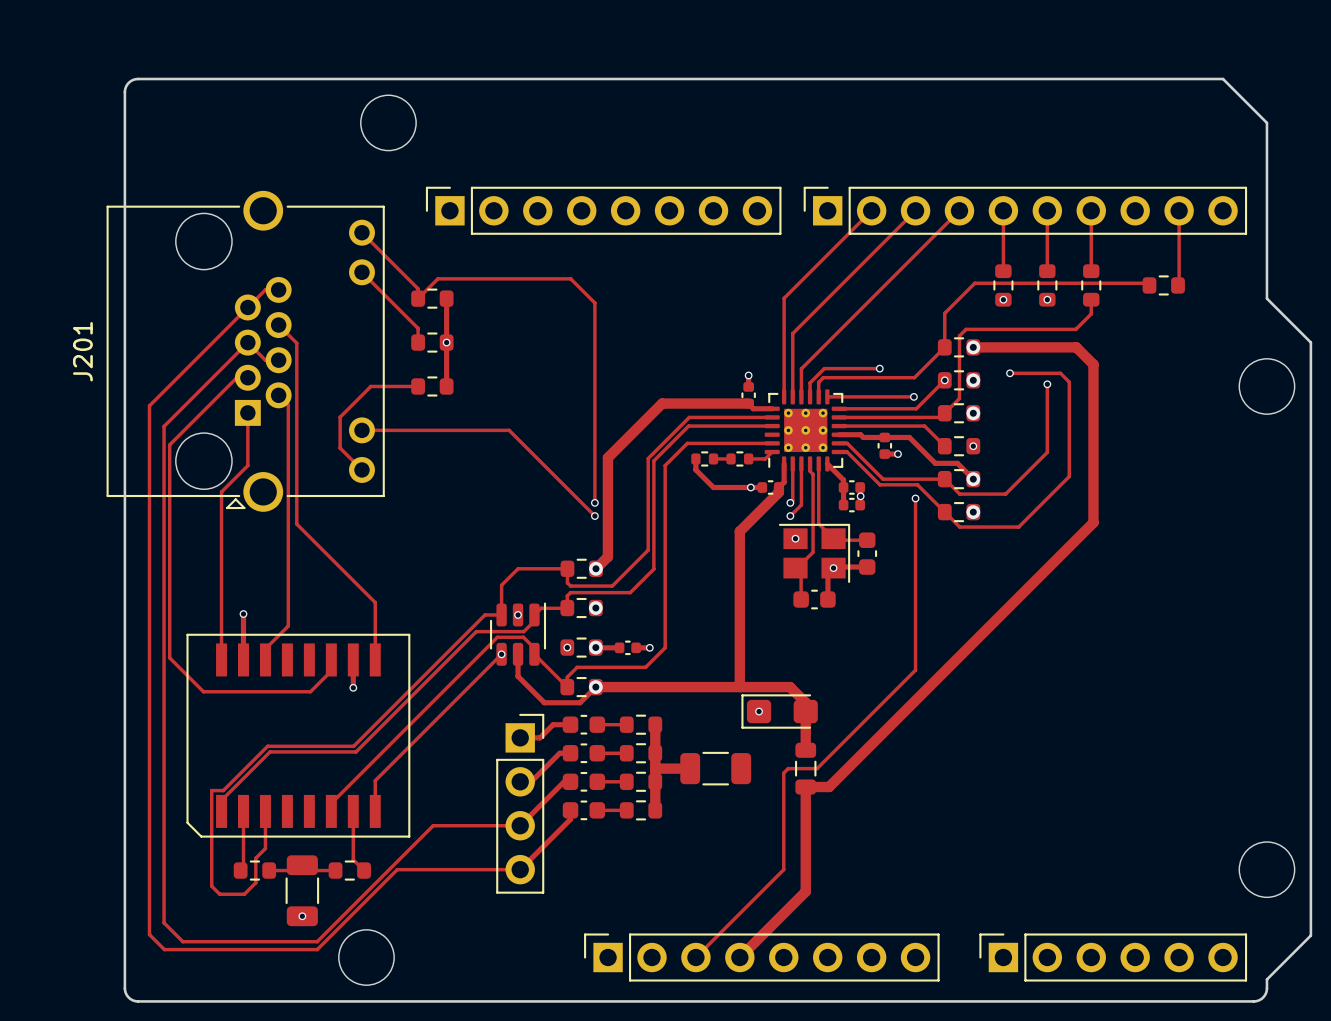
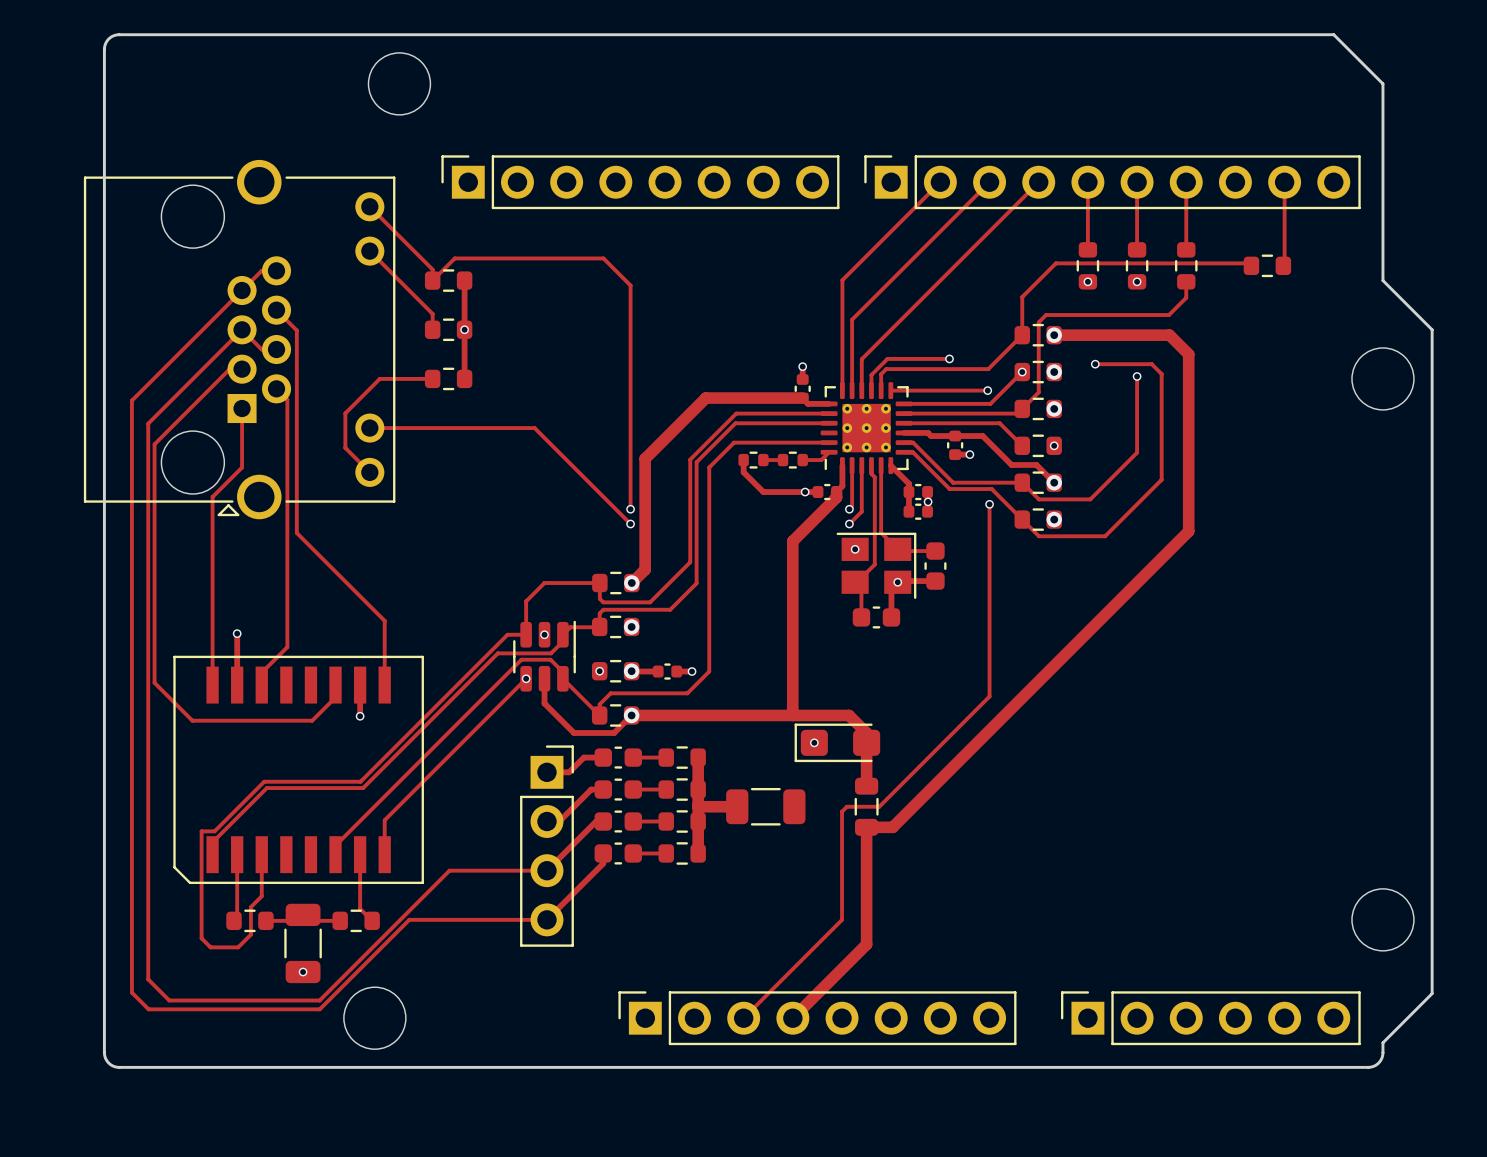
J201 name: J201 (82, 351) -> none

